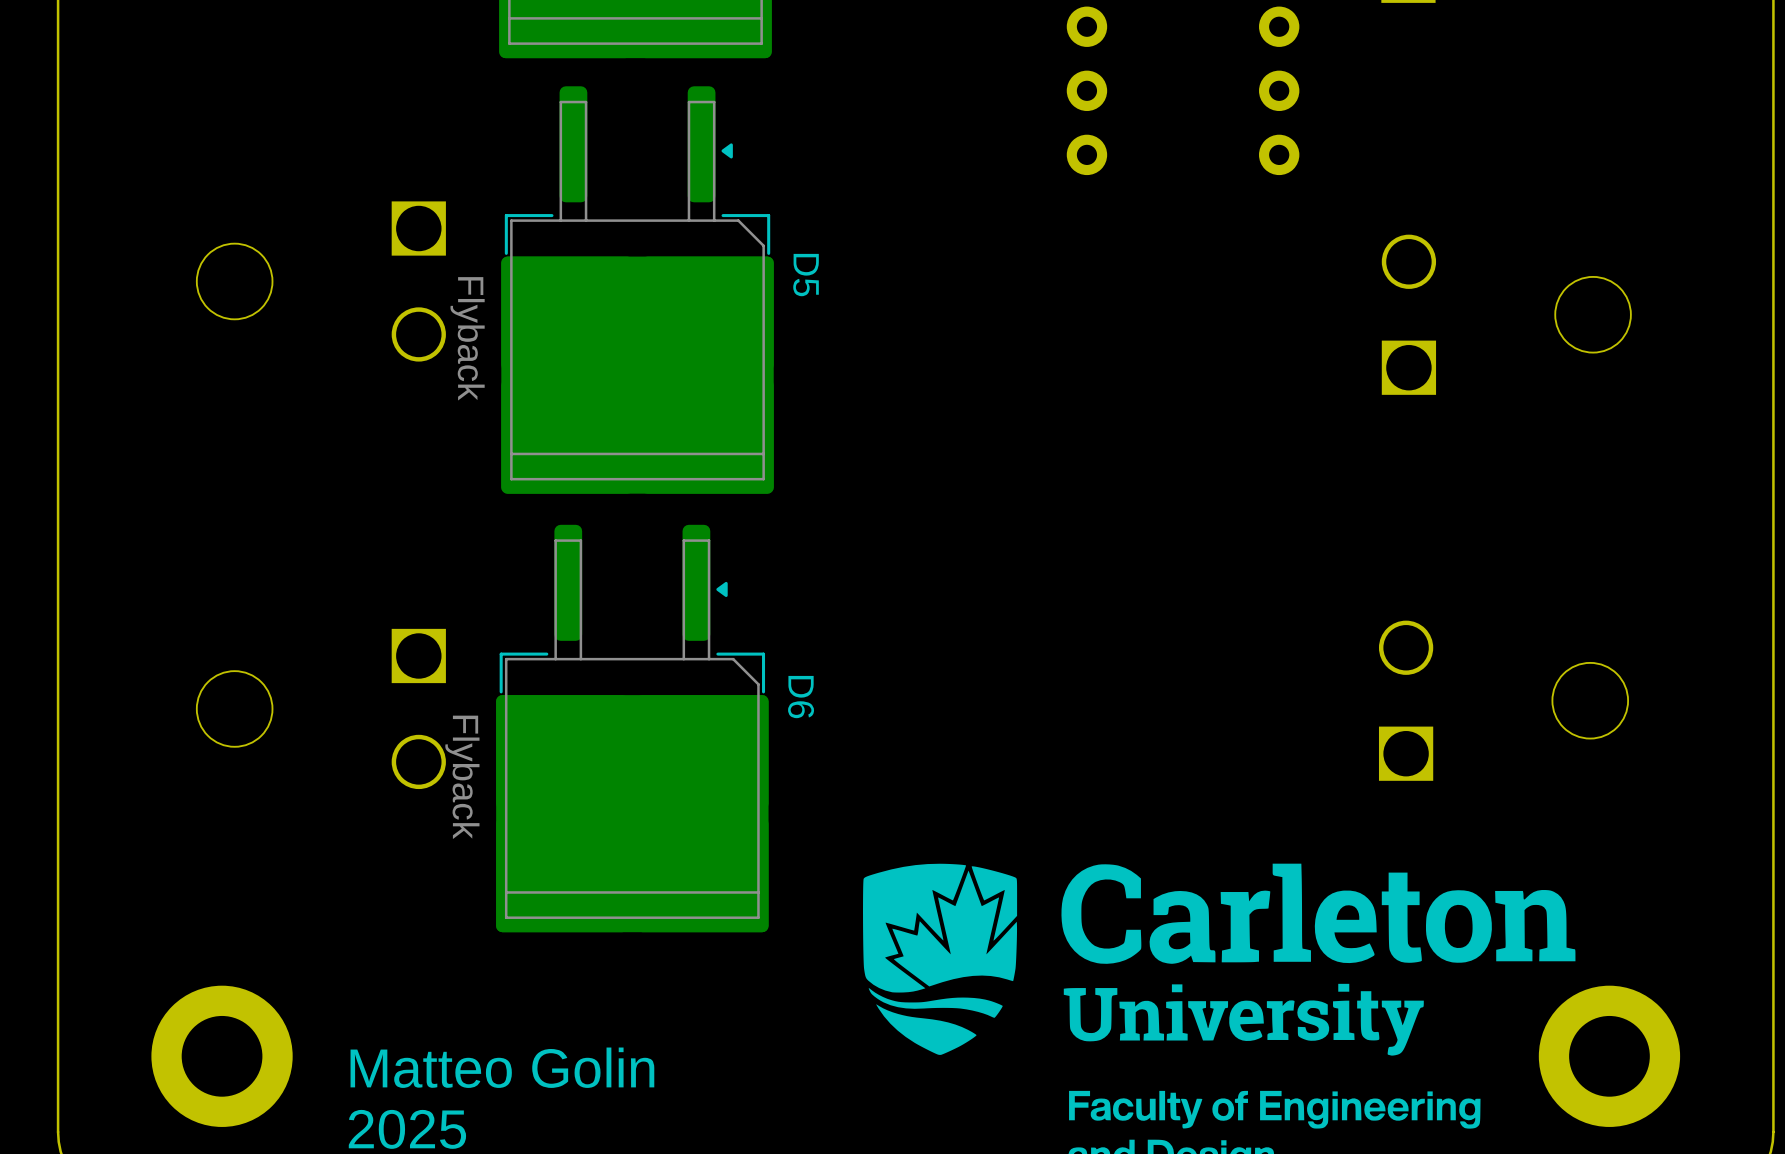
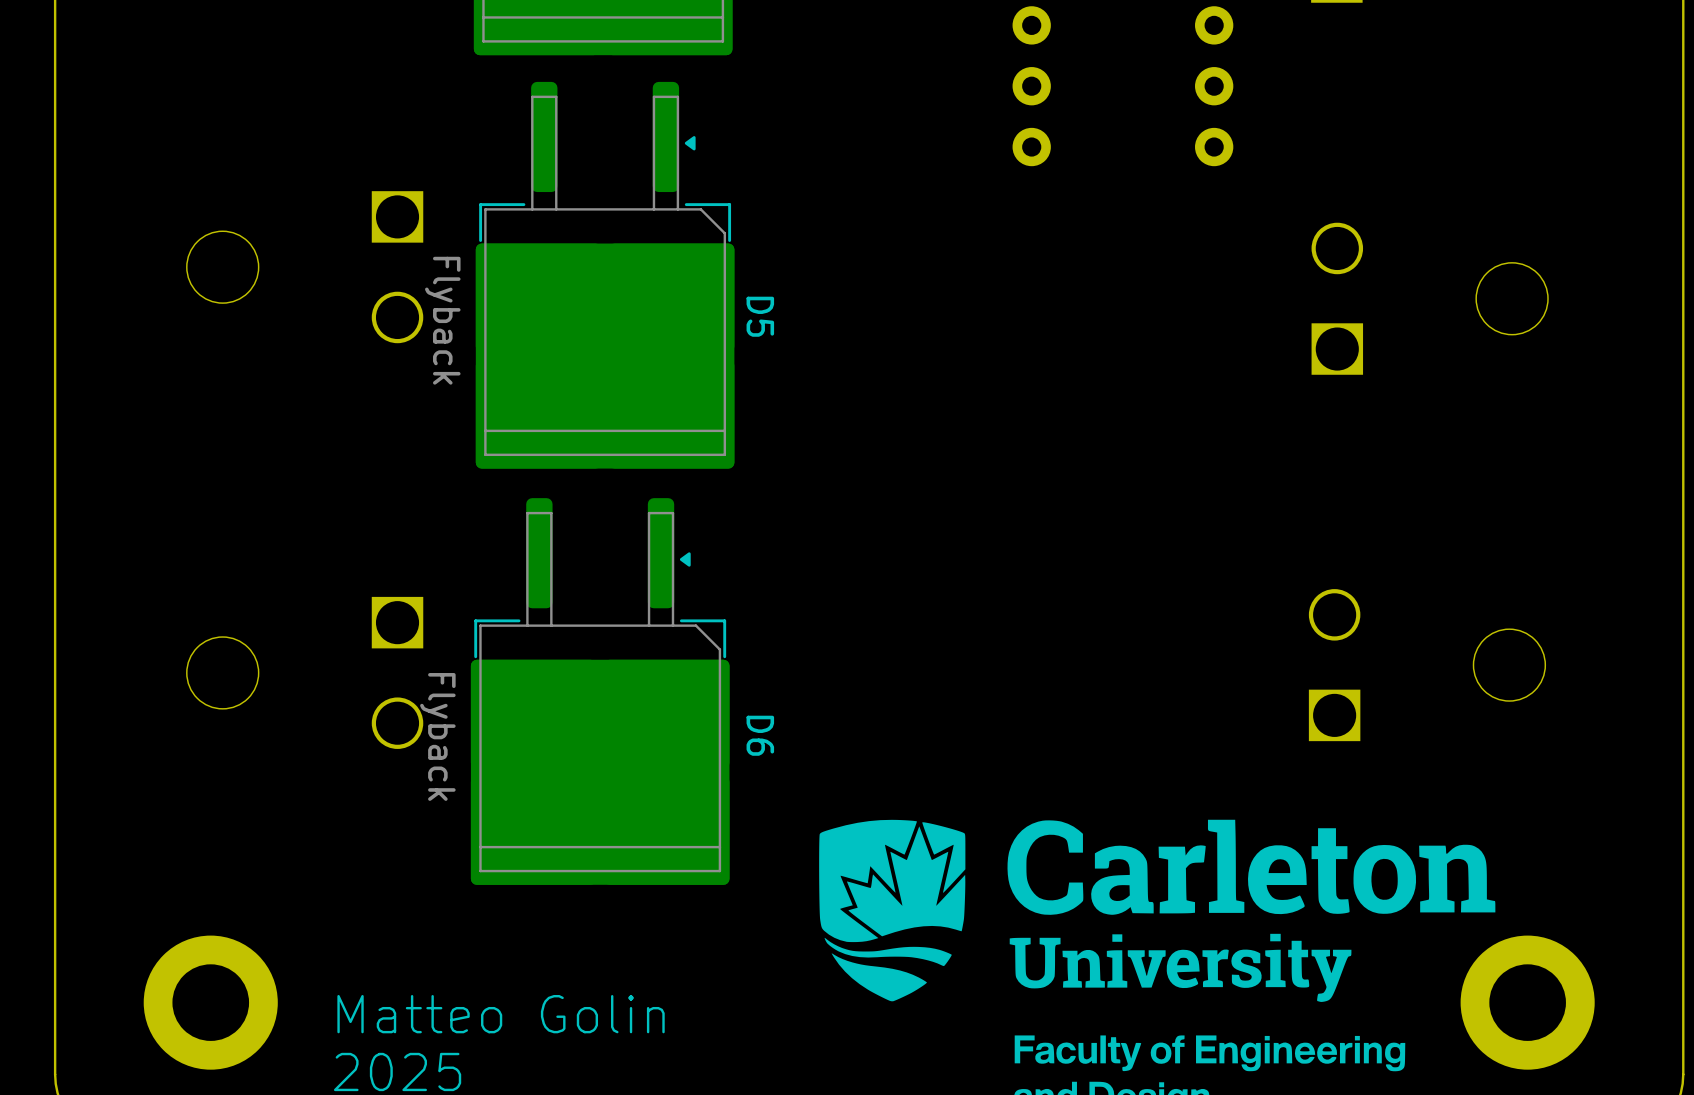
D5 name position: D5 (806, 275) -> D5 (760, 316)
D6 name position: D6 (801, 697) -> D6 (760, 735)

